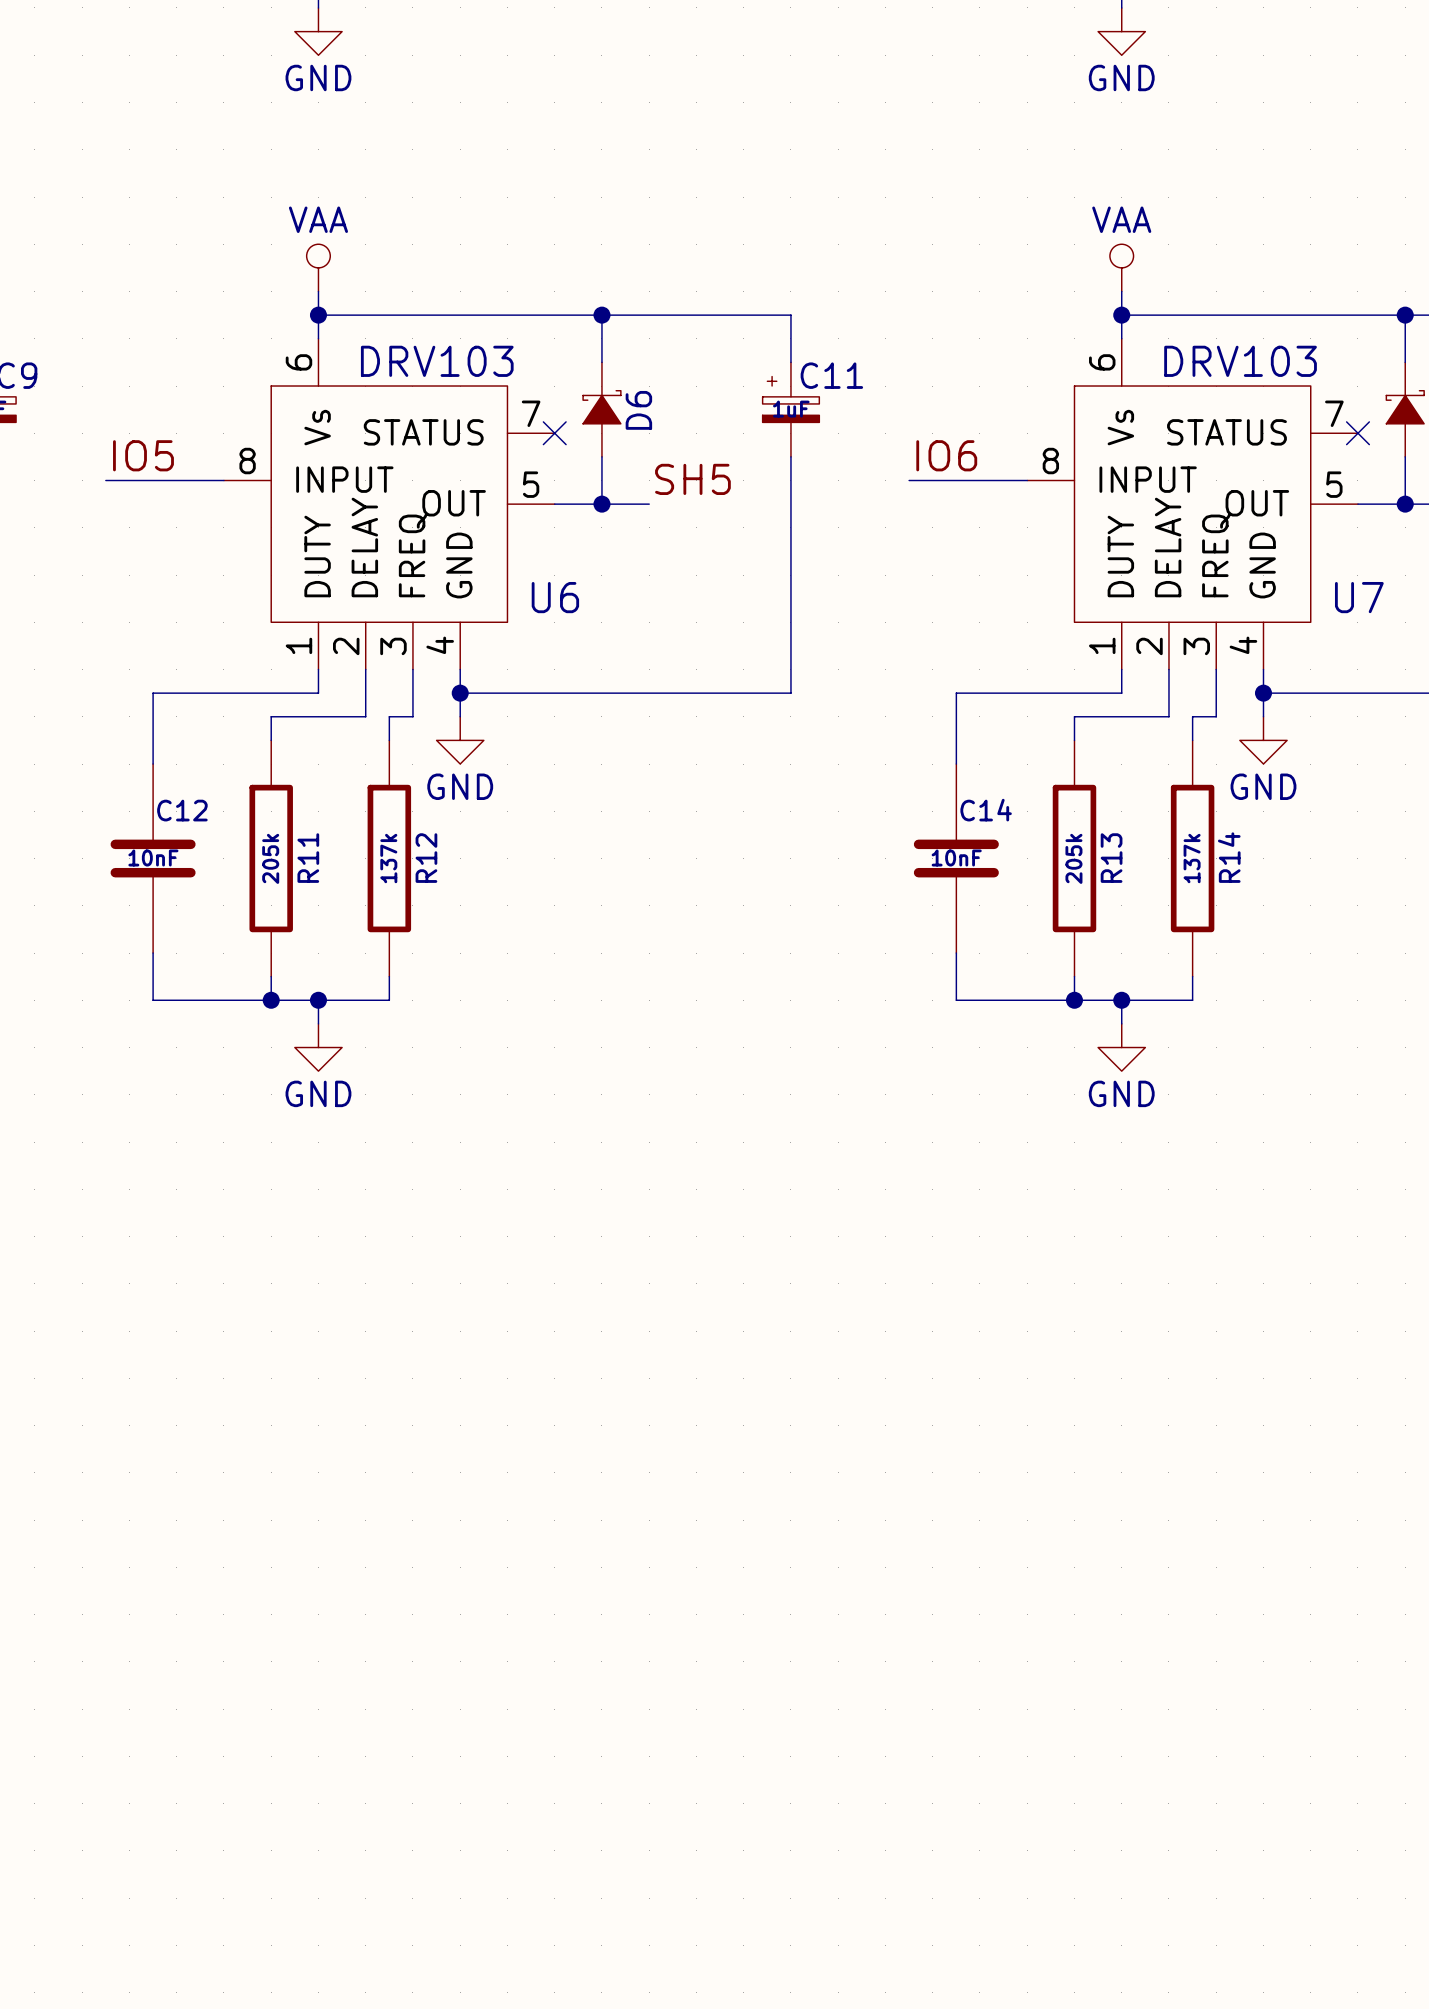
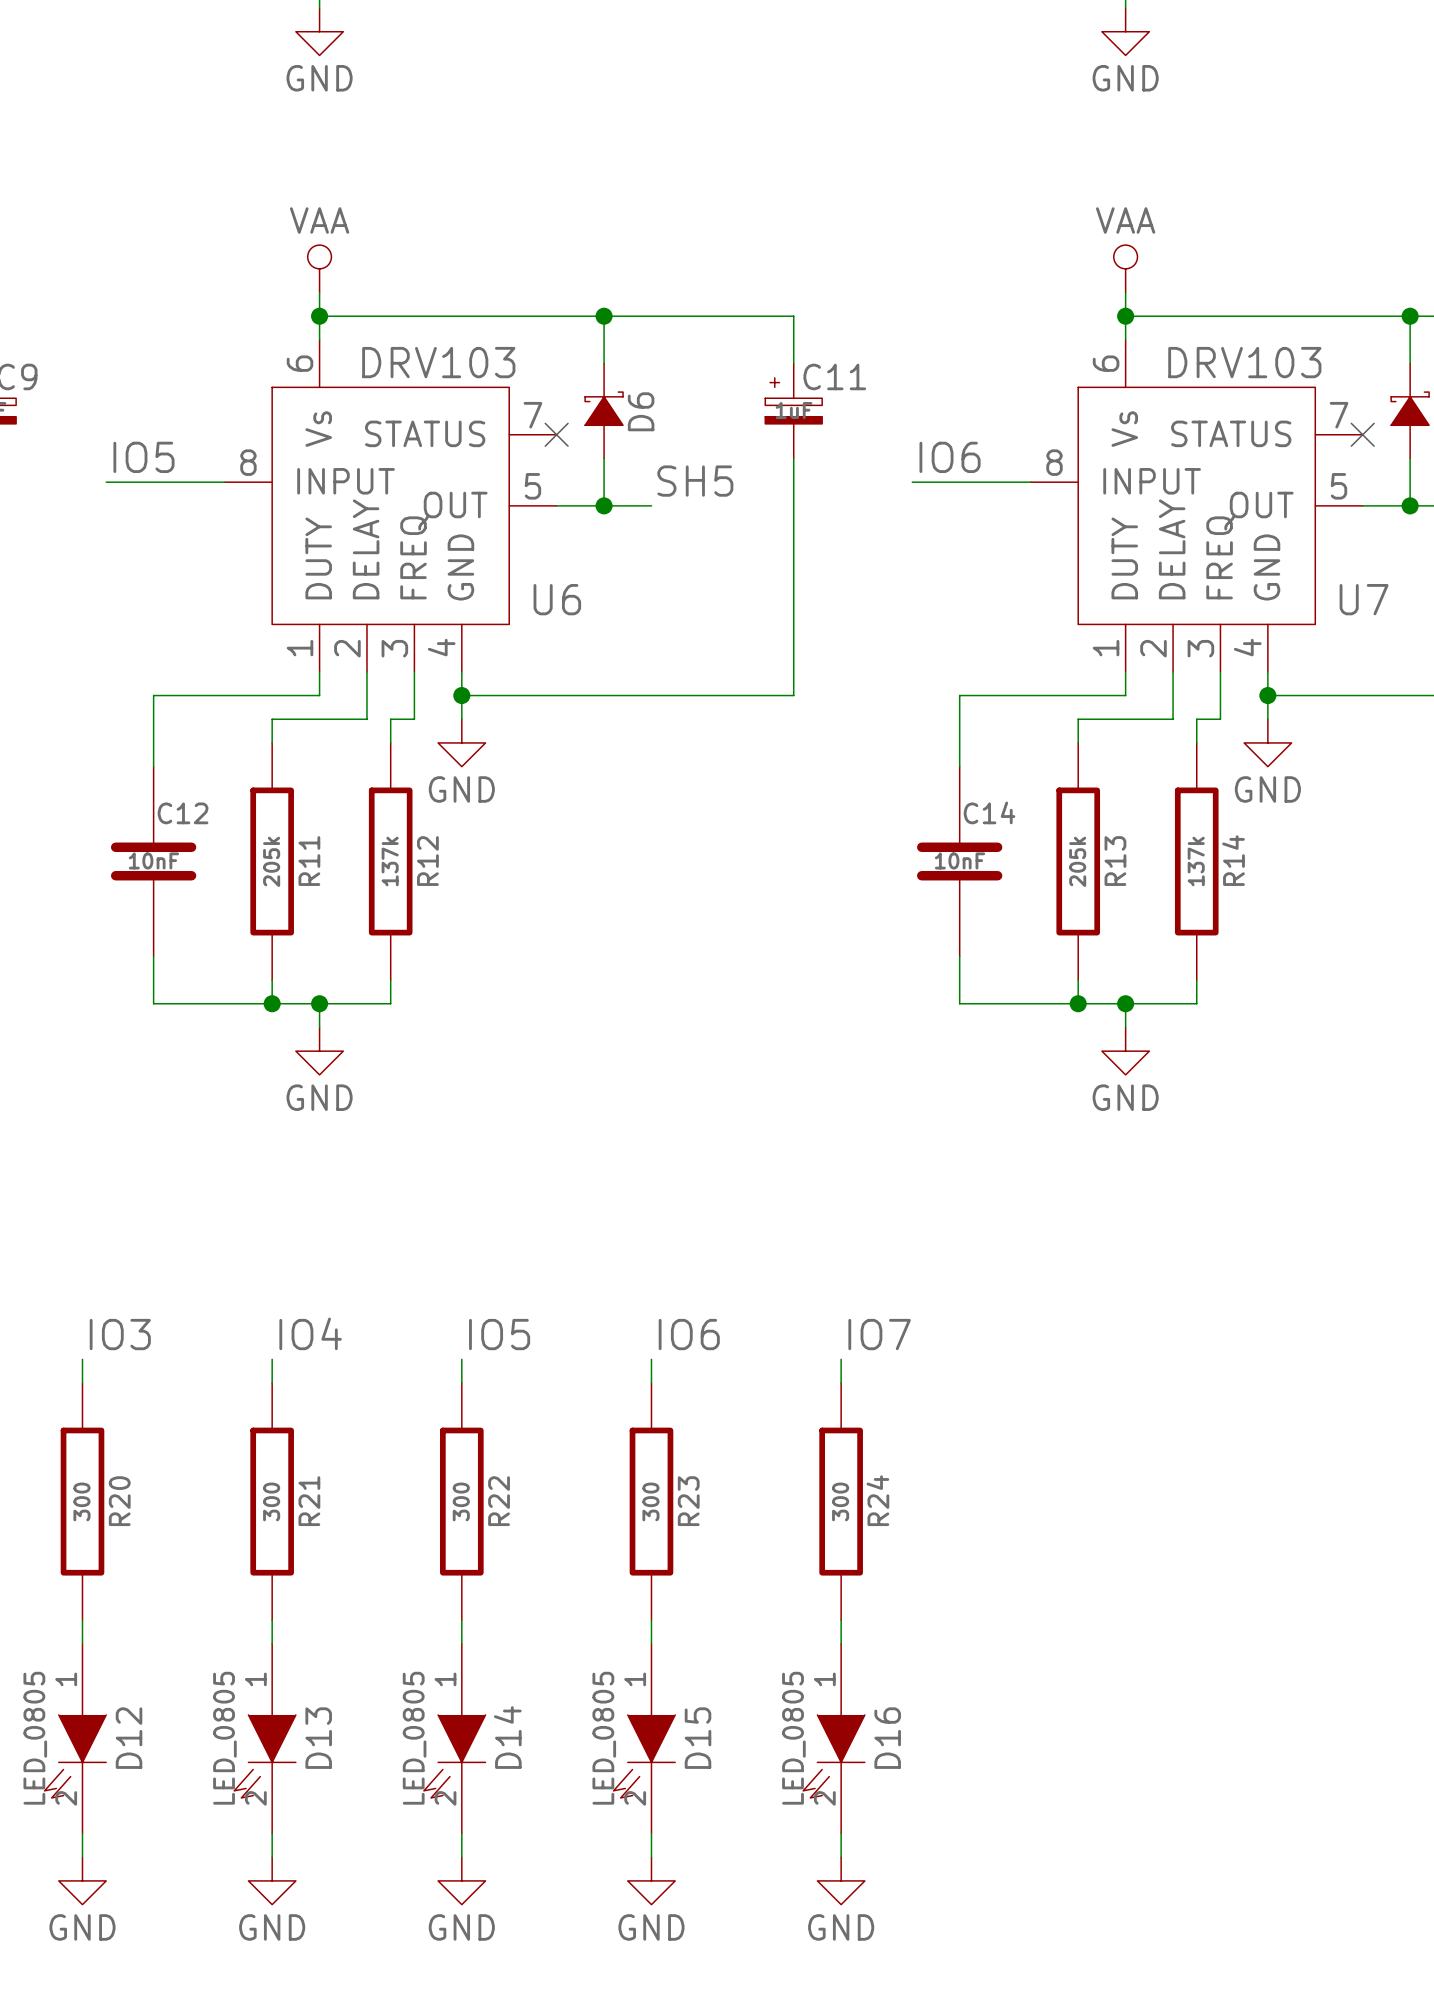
label: none -> IO3 (120, 1334)
label: none -> IO4 (310, 1333)
label: none -> IO5 (499, 1334)
label: none -> IO6 (689, 1334)
label: none -> IO7 (879, 1334)
wire: none -> (82, 1359) (82, 1383)
wire: none -> (272, 1359) (272, 1383)
wire: none -> (461, 1359) (461, 1383)
wire: none -> (651, 1359) (651, 1383)
wire: none -> (841, 1359) (841, 1383)
R20: none -> 300 (82, 1501)
R21: none -> 300 (272, 1501)
R22: none -> 300 (461, 1501)
R23: none -> 300 (651, 1501)
R24: none -> 300 (841, 1501)
wire: none -> (82, 1620) (82, 1643)
wire: none -> (272, 1620) (272, 1643)
wire: none -> (461, 1620) (461, 1643)
wire: none -> (651, 1620) (651, 1643)
wire: none -> (841, 1620) (841, 1643)
D12: none -> LED_0805 (75, 1738)
D13: none -> LED_0805 (265, 1738)
D14: none -> LED_0805 (454, 1738)
D15: none -> LED_0805 (644, 1738)
D16: none -> LED_0805 (834, 1738)
wire: none -> (82, 1833) (82, 1857)
wire: none -> (272, 1833) (272, 1857)
wire: none -> (461, 1833) (461, 1857)
wire: none -> (651, 1833) (651, 1857)
wire: none -> (841, 1833) (841, 1857)
power symbol: none -> GND (82, 1880)
power symbol: none -> GND (272, 1880)
power symbol: none -> GND (461, 1880)
power symbol: none -> GND (651, 1880)
power symbol: none -> GND (841, 1880)

